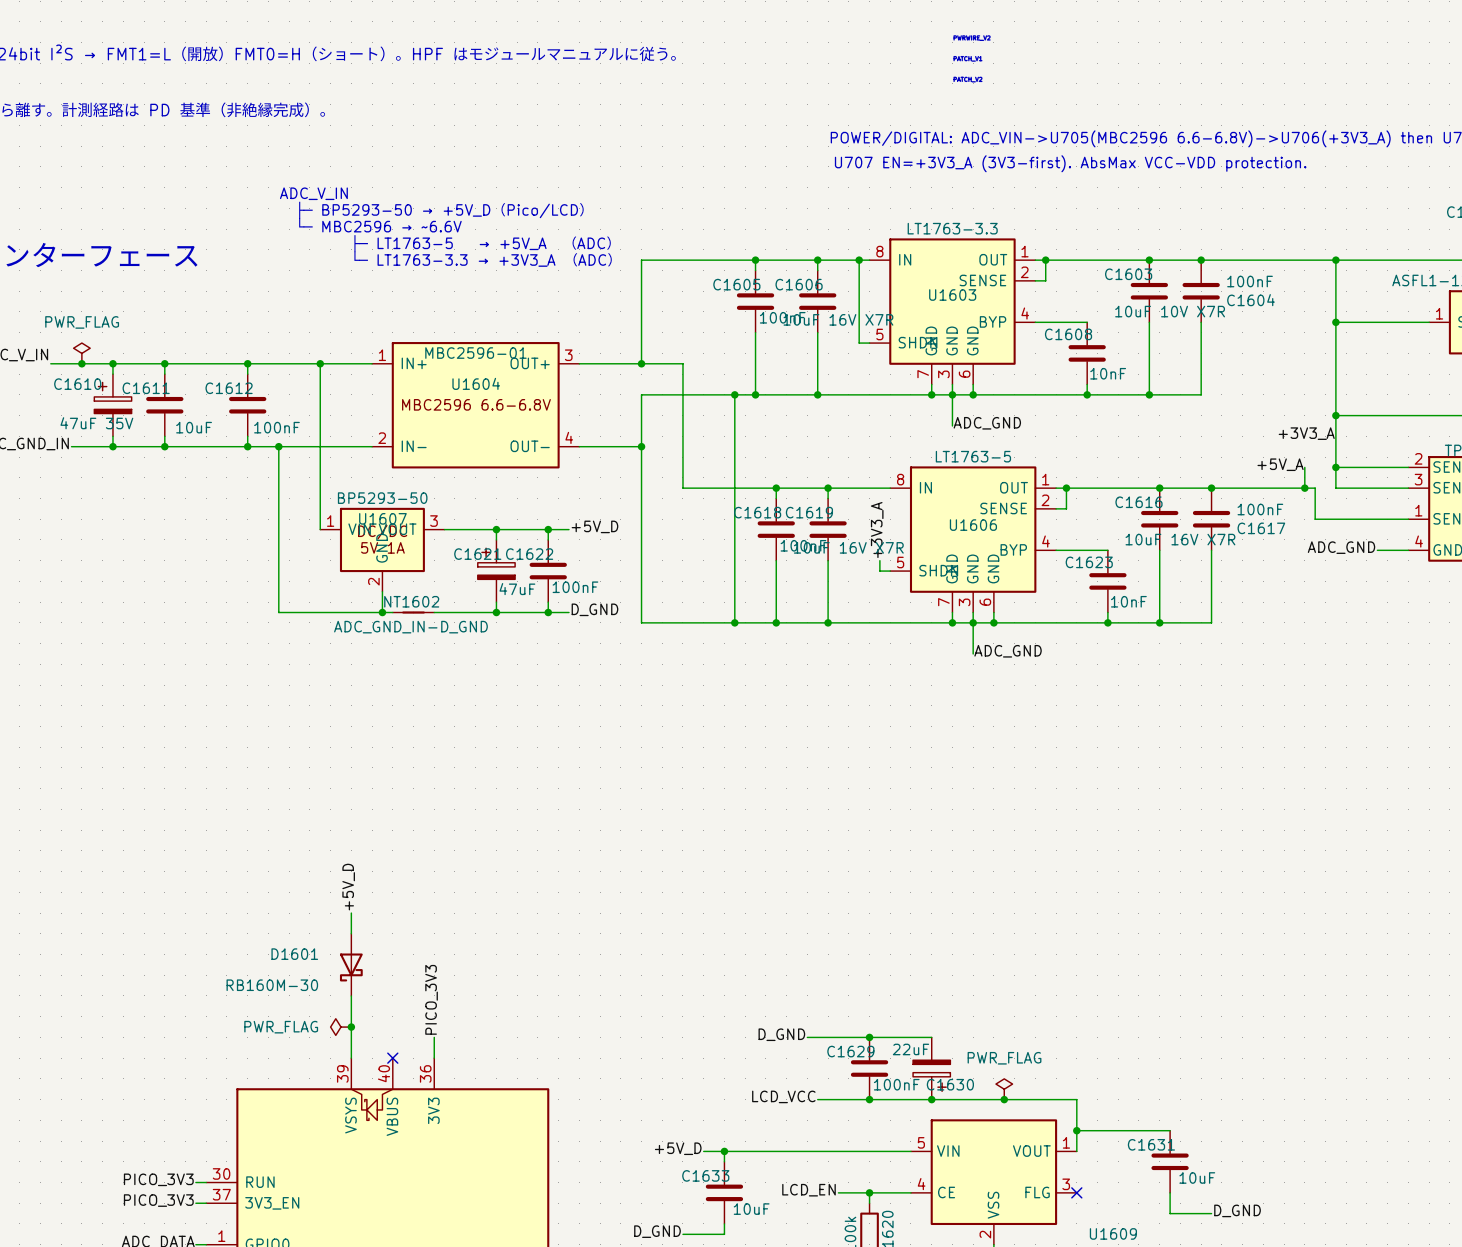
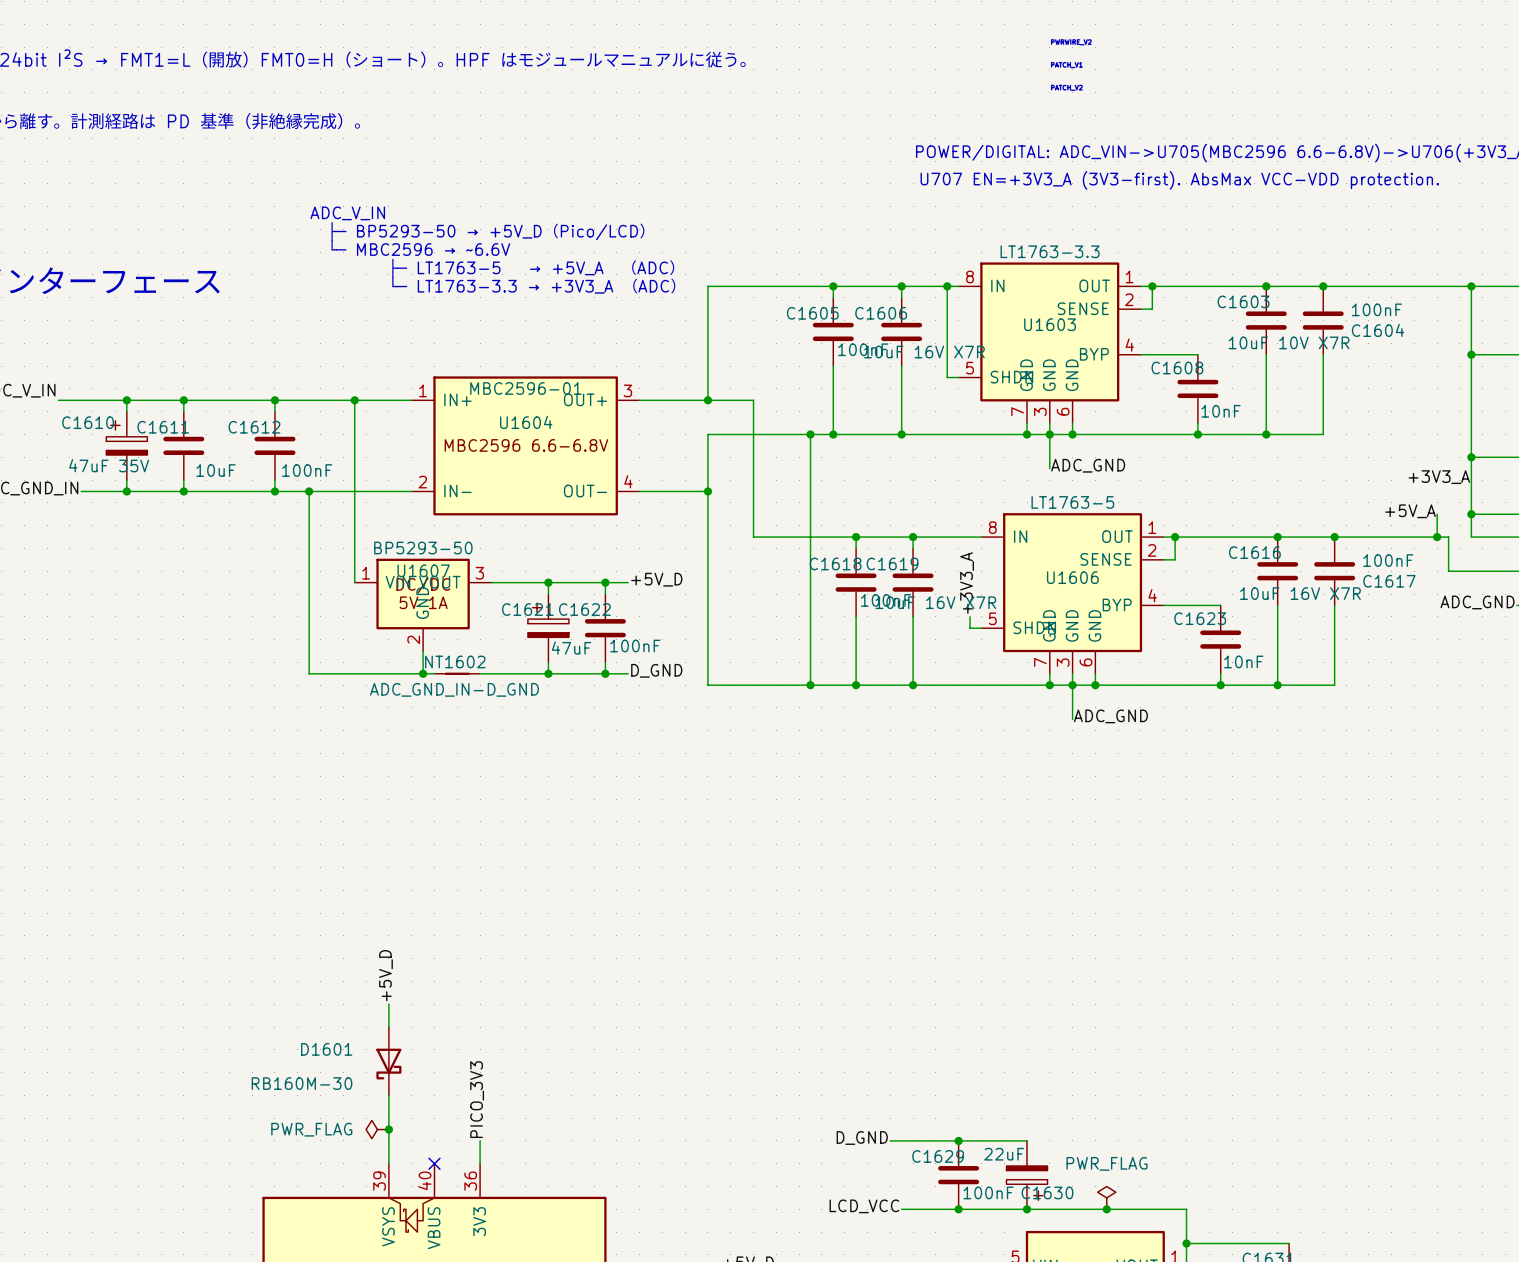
power symbol: PWR_FLAG (81, 353) -> none
junction: (81, 363) -> none

